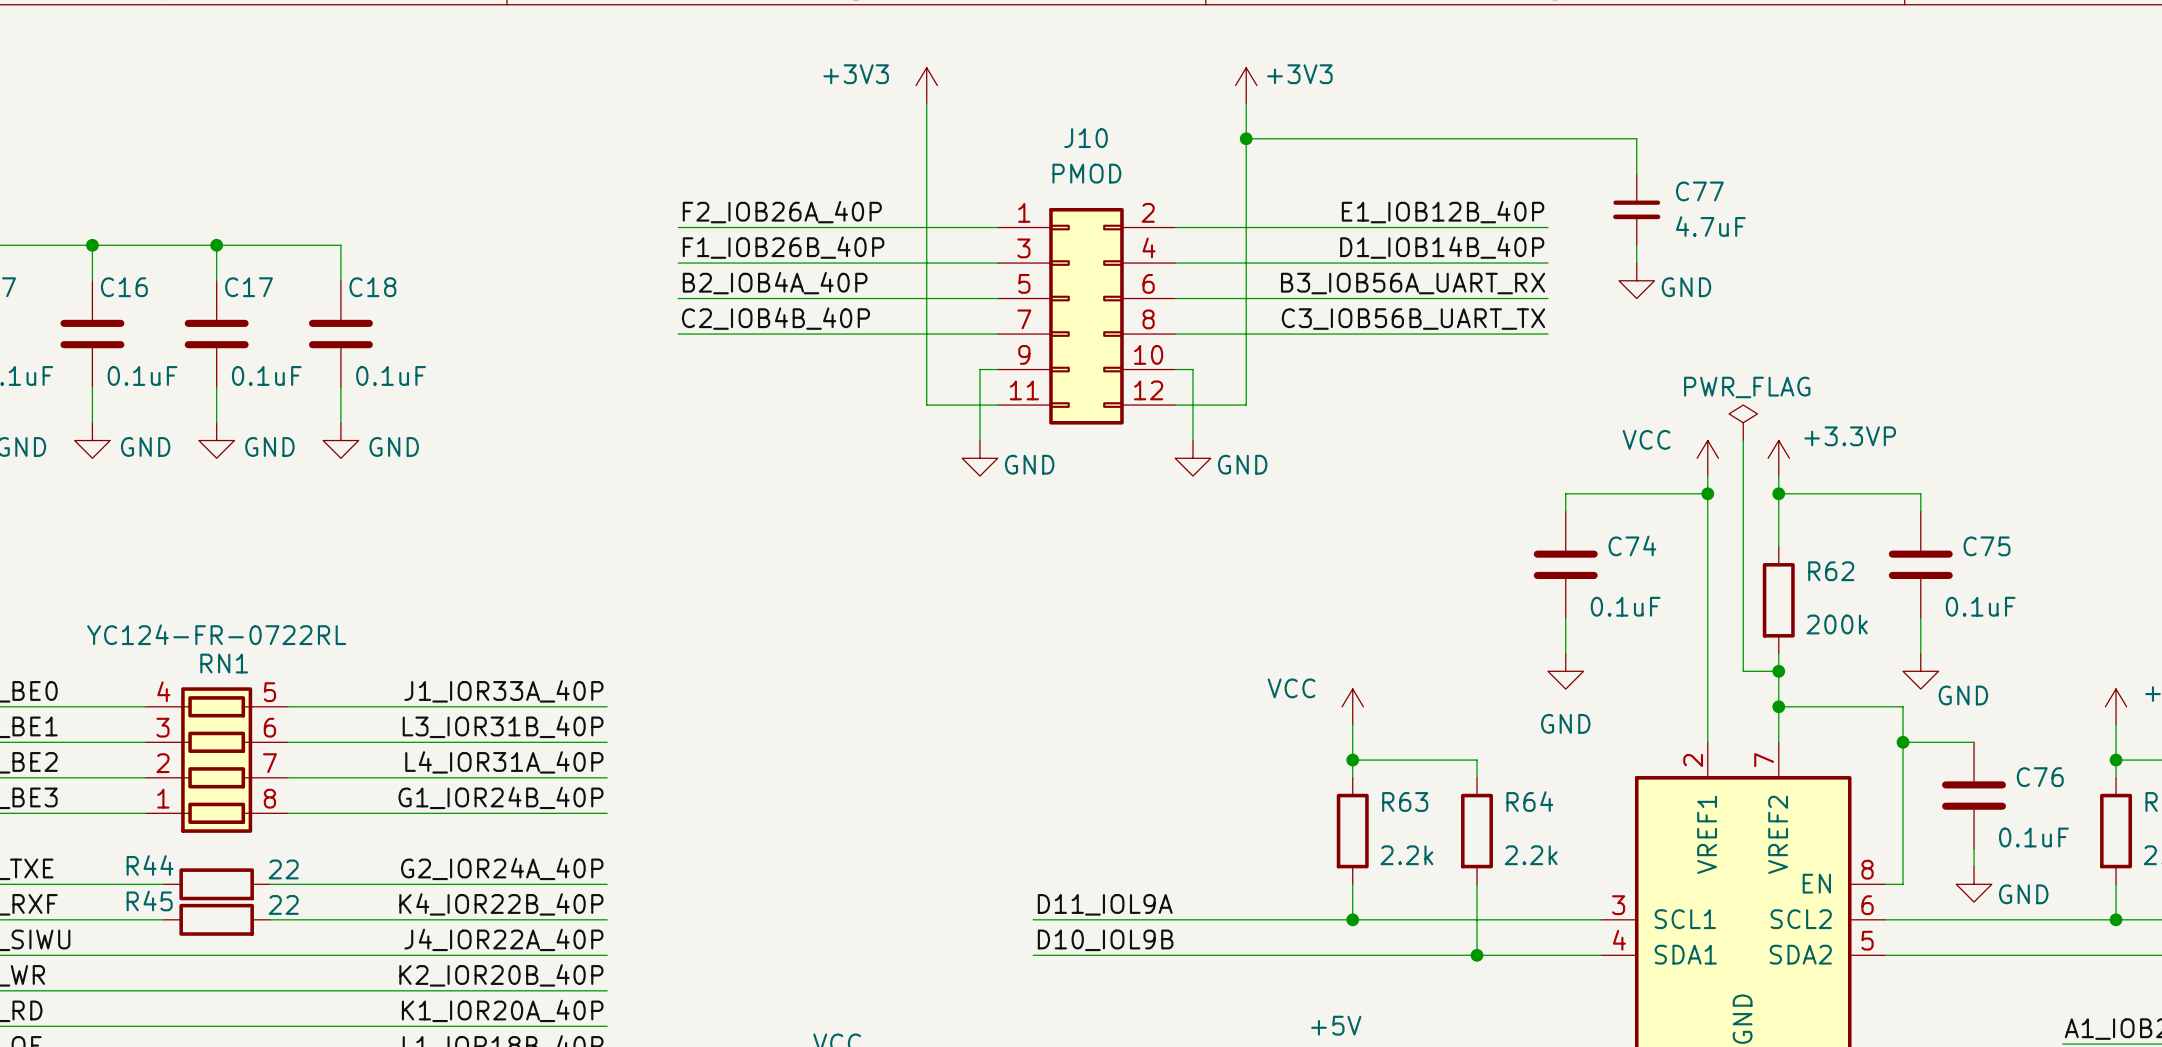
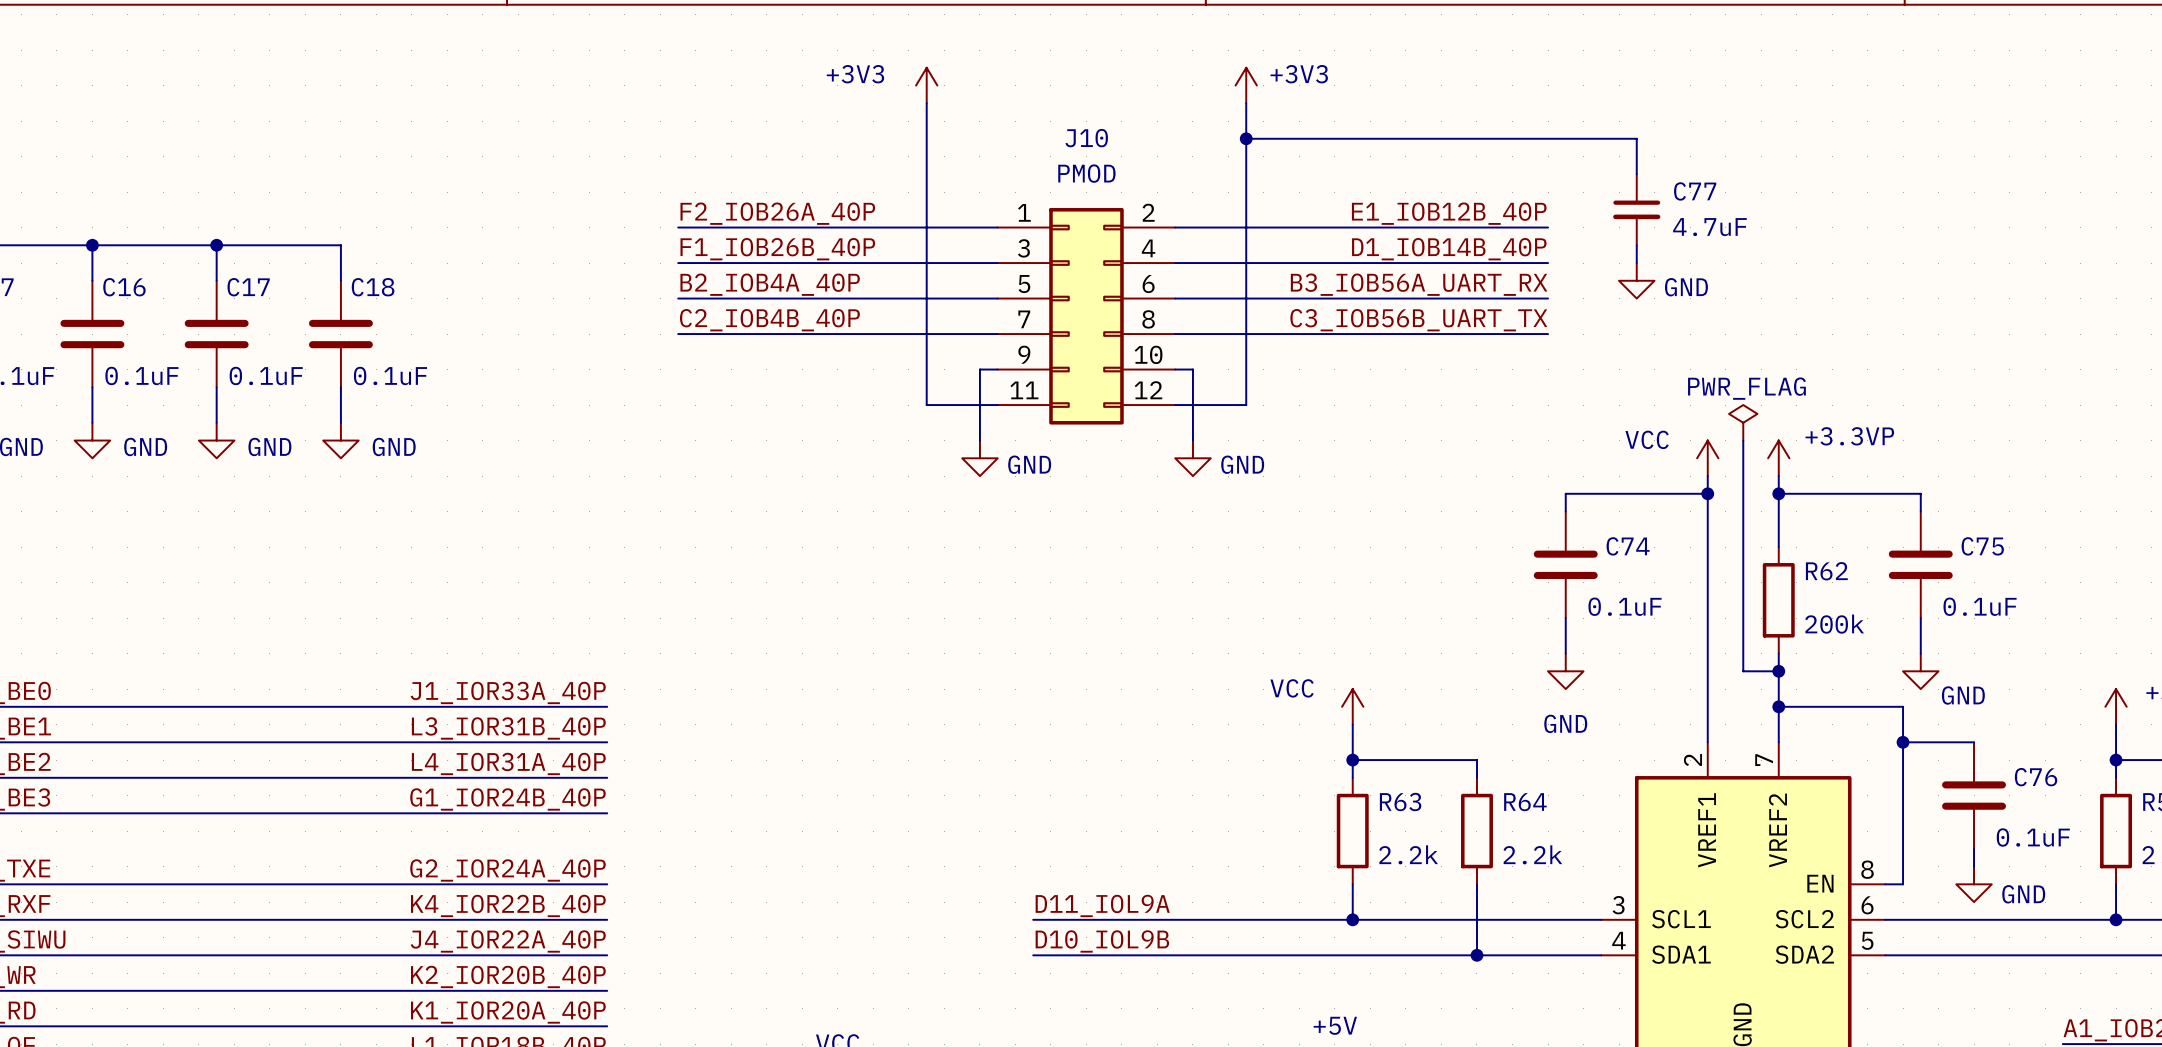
RN1: YC124-FR-0722RL (216, 760) -> none
wire: none -> (163, 884) (269, 884)
R44: 22 (216, 884) -> none
wire: none -> (163, 919) (269, 919)
R45: 22 (216, 919) -> none

